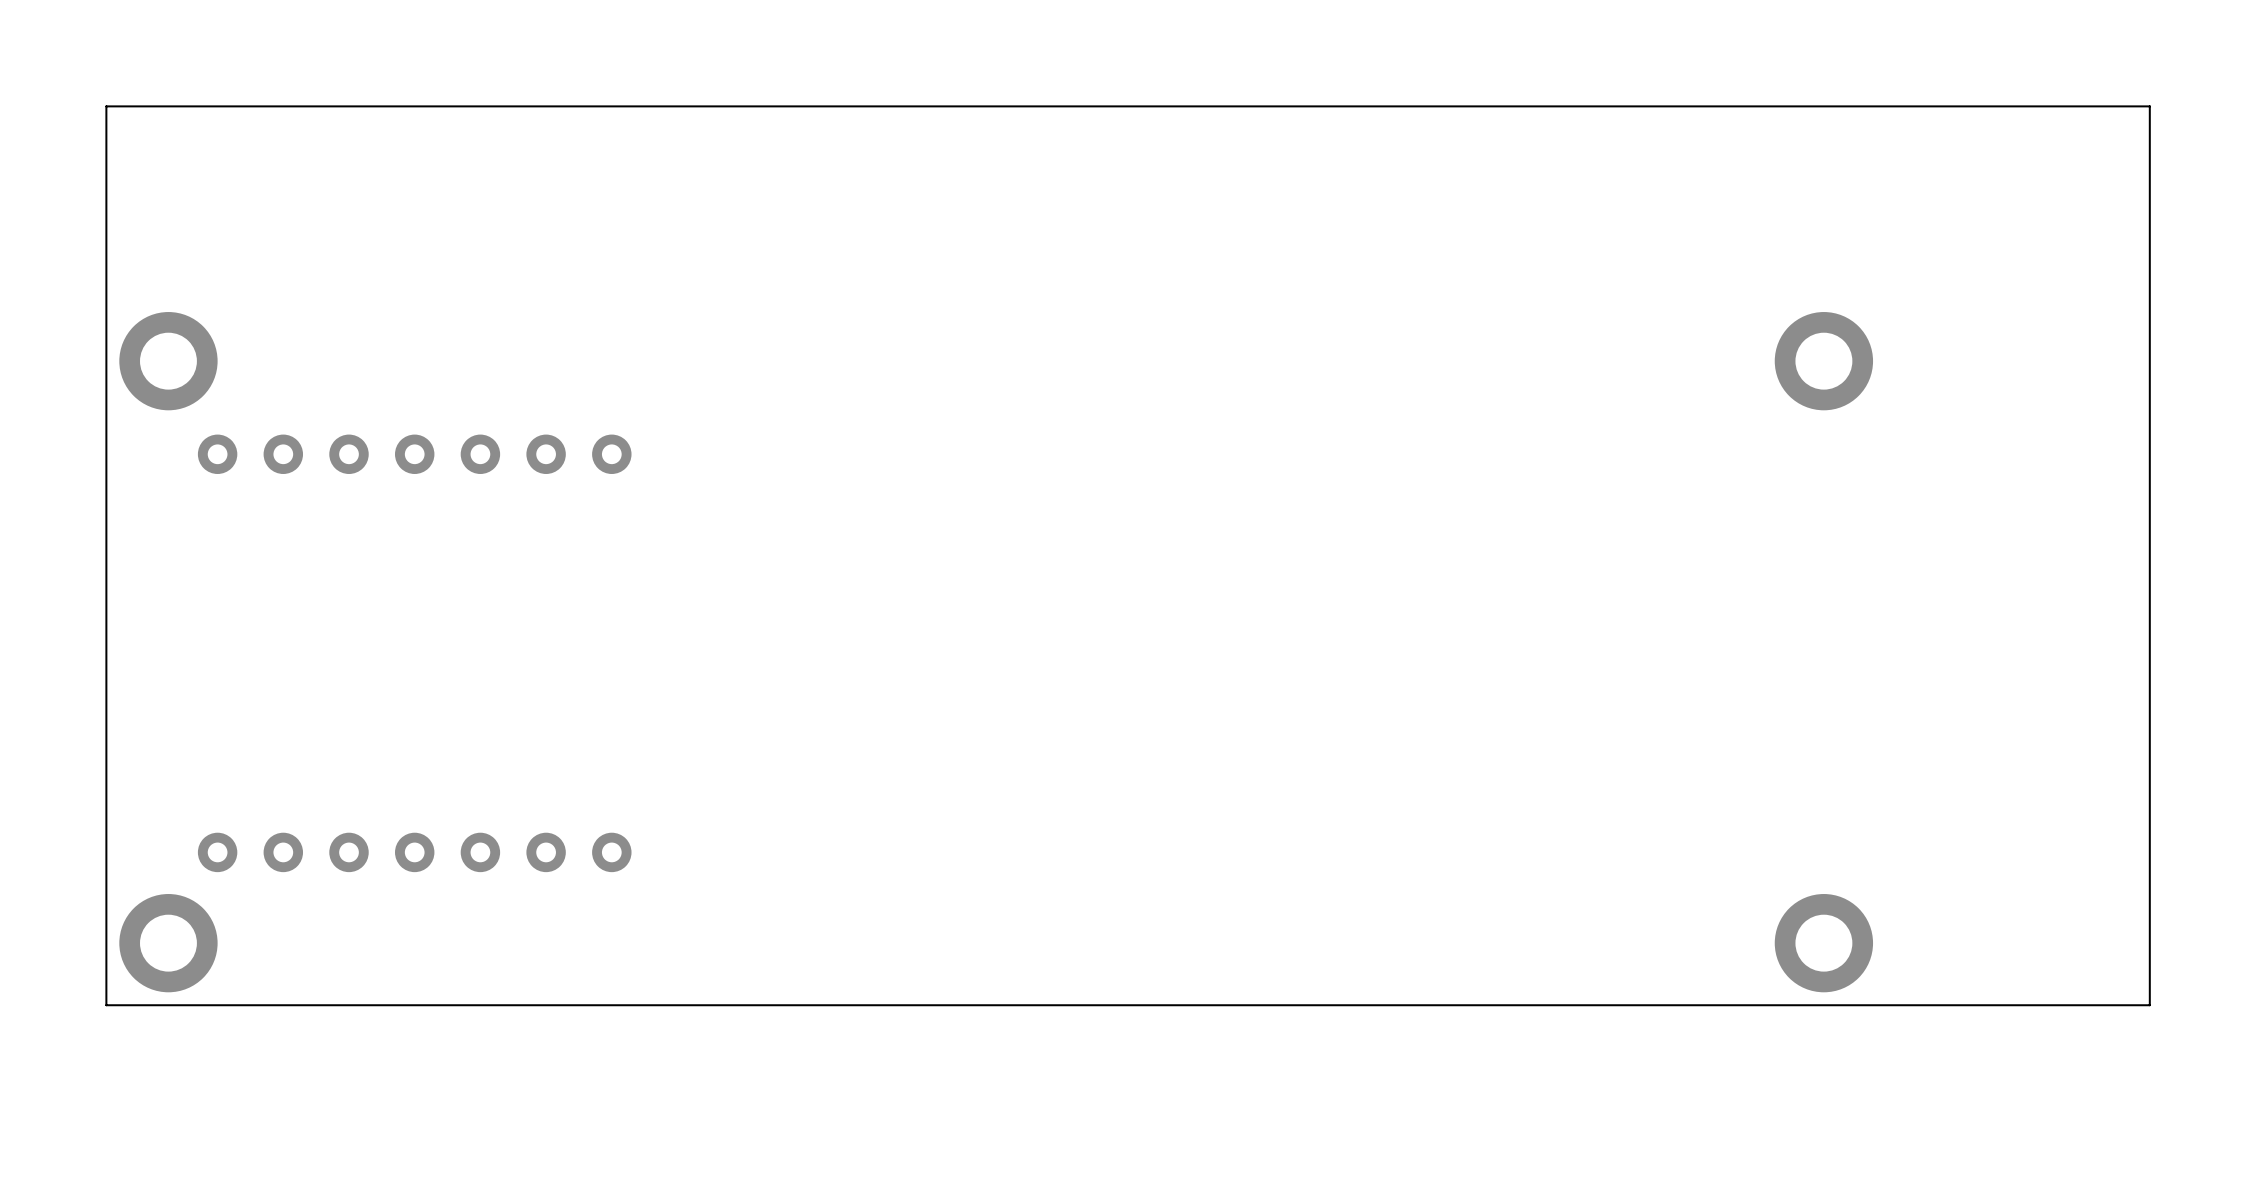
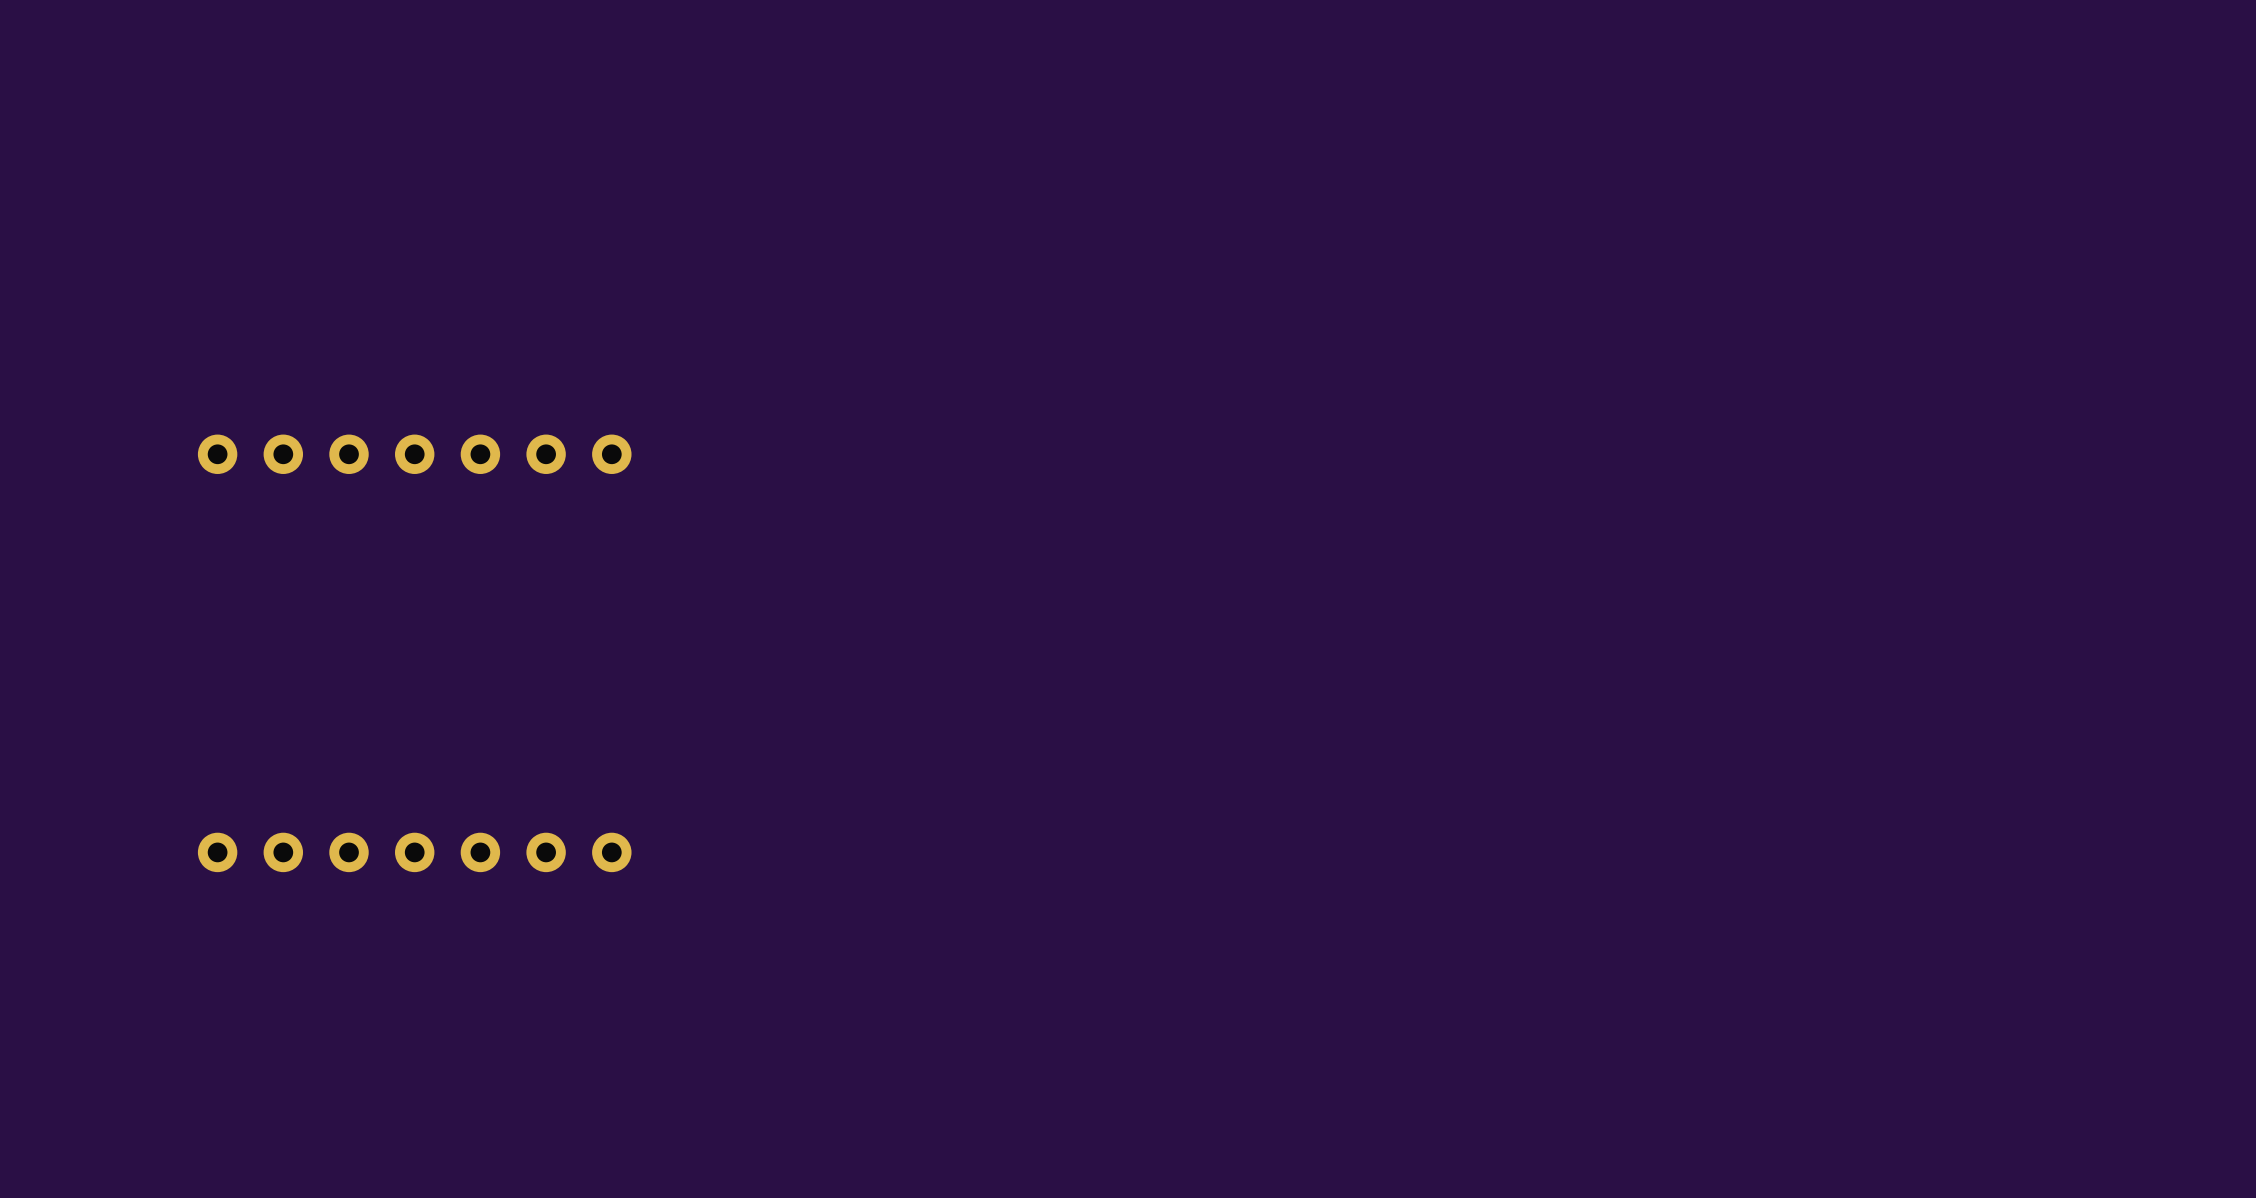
board edge: (2149, 106) (106, 106) (106, 1005) (2149, 1005) (2149, 106) -> none
part: (168, 361) -> none
part: (1823, 361) -> none
part: (168, 943) -> none
part: (1823, 943) -> none

